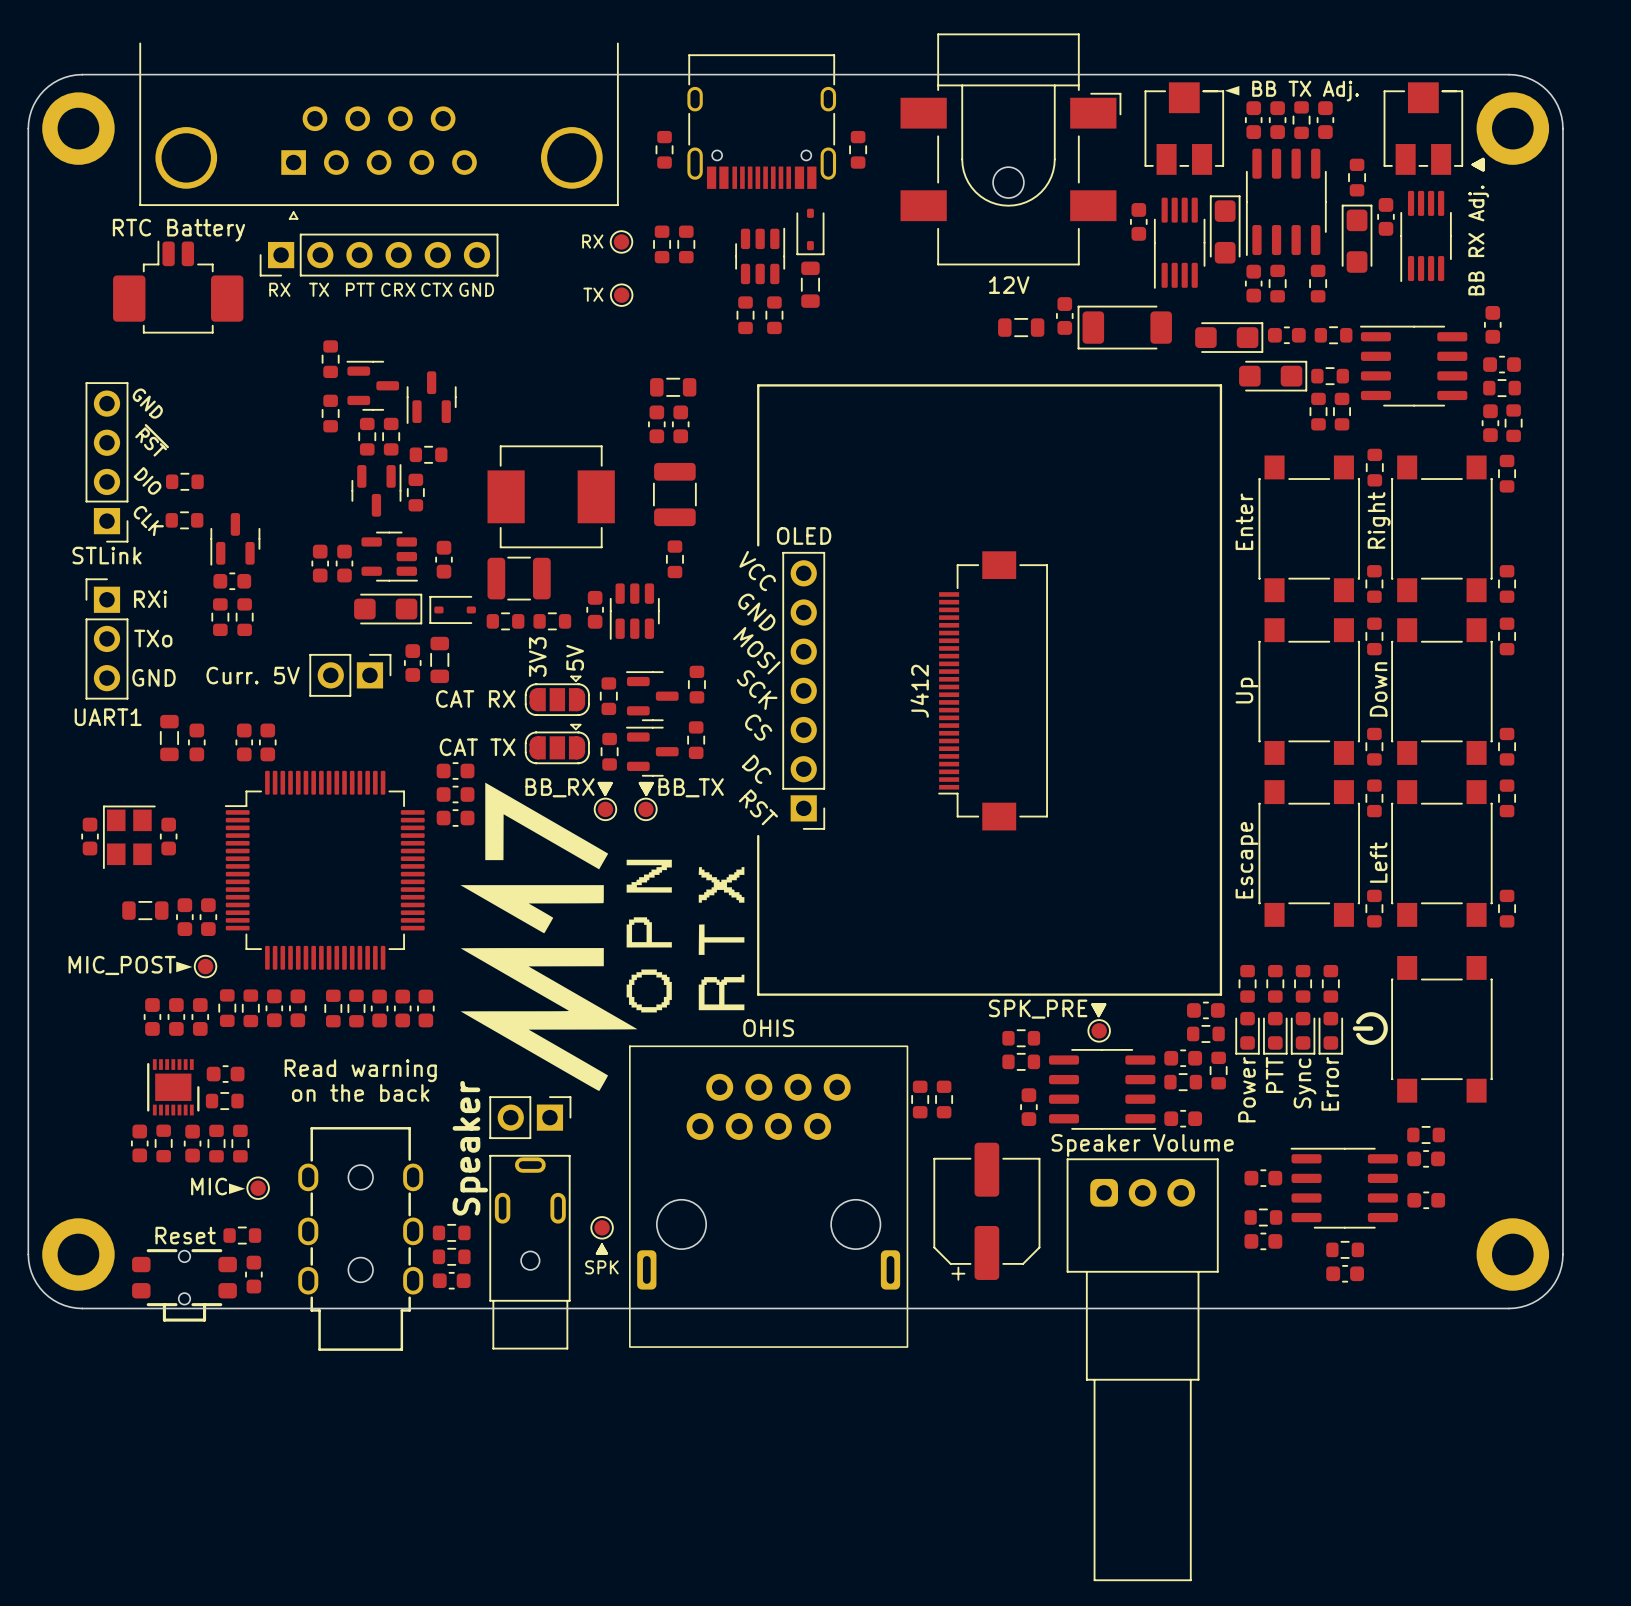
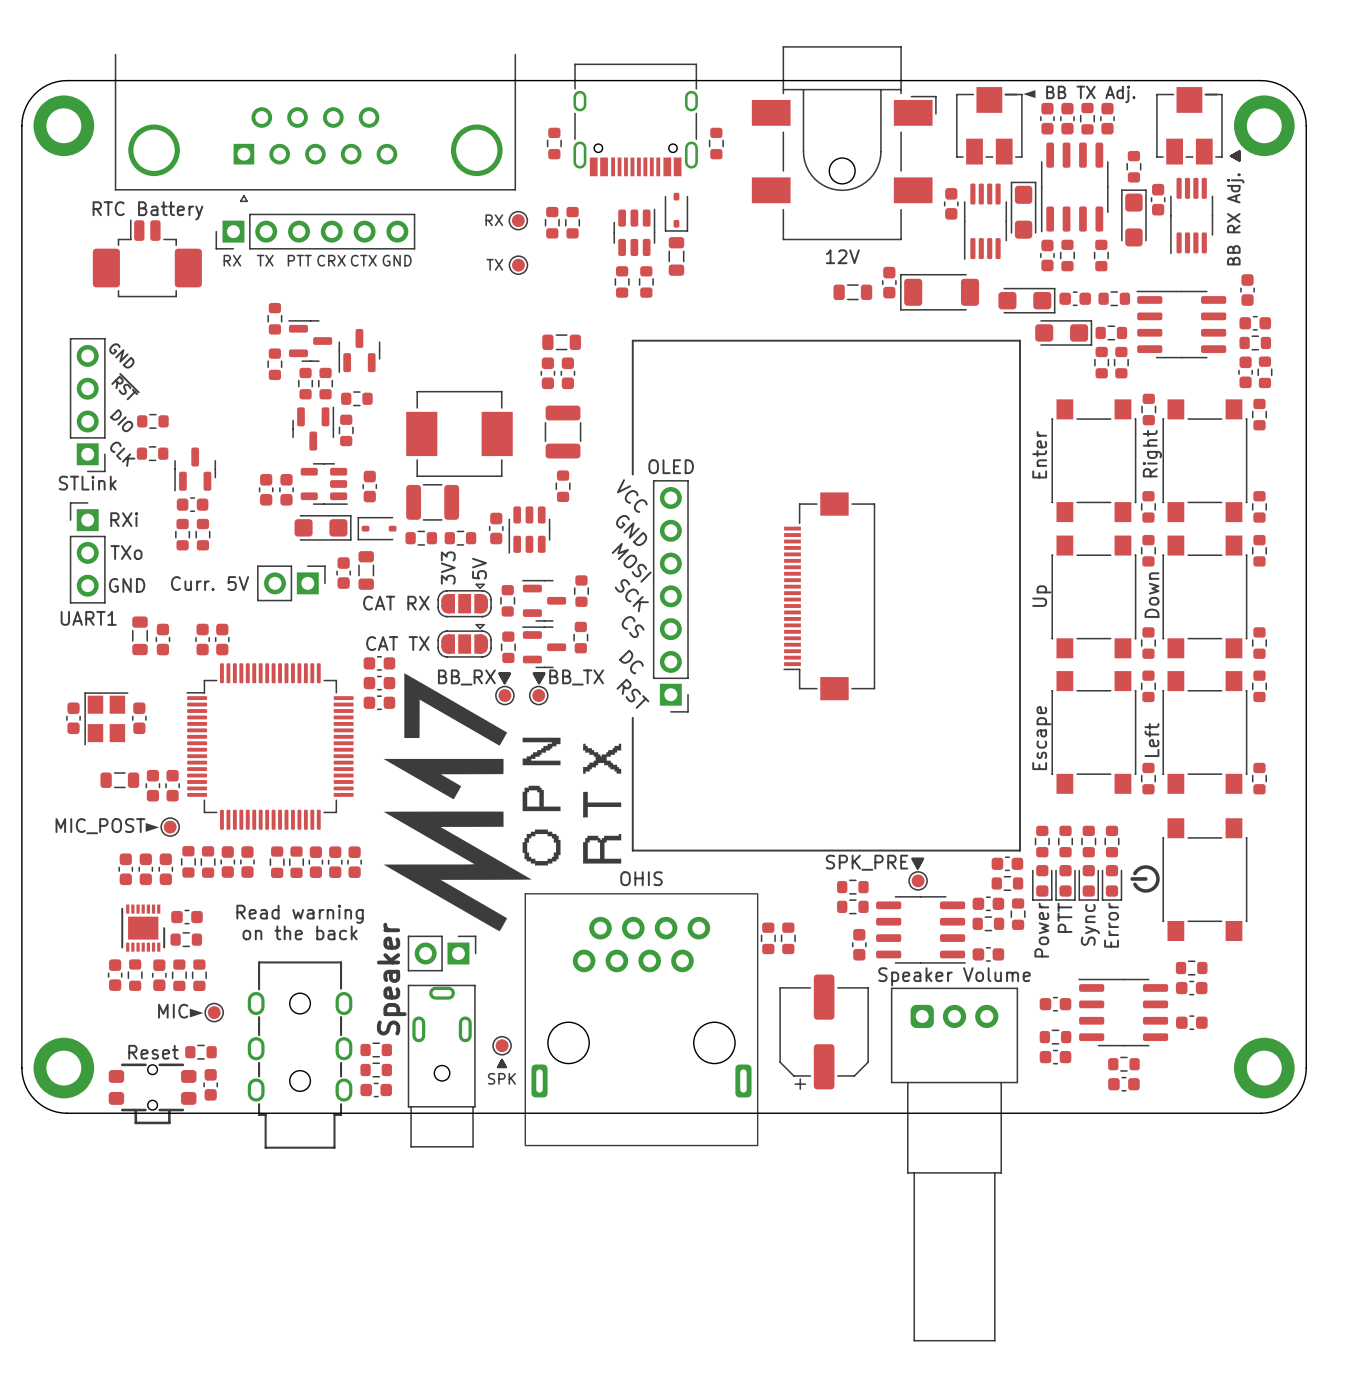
J412: (993, 690) -> none
part: none -> (829, 596)

